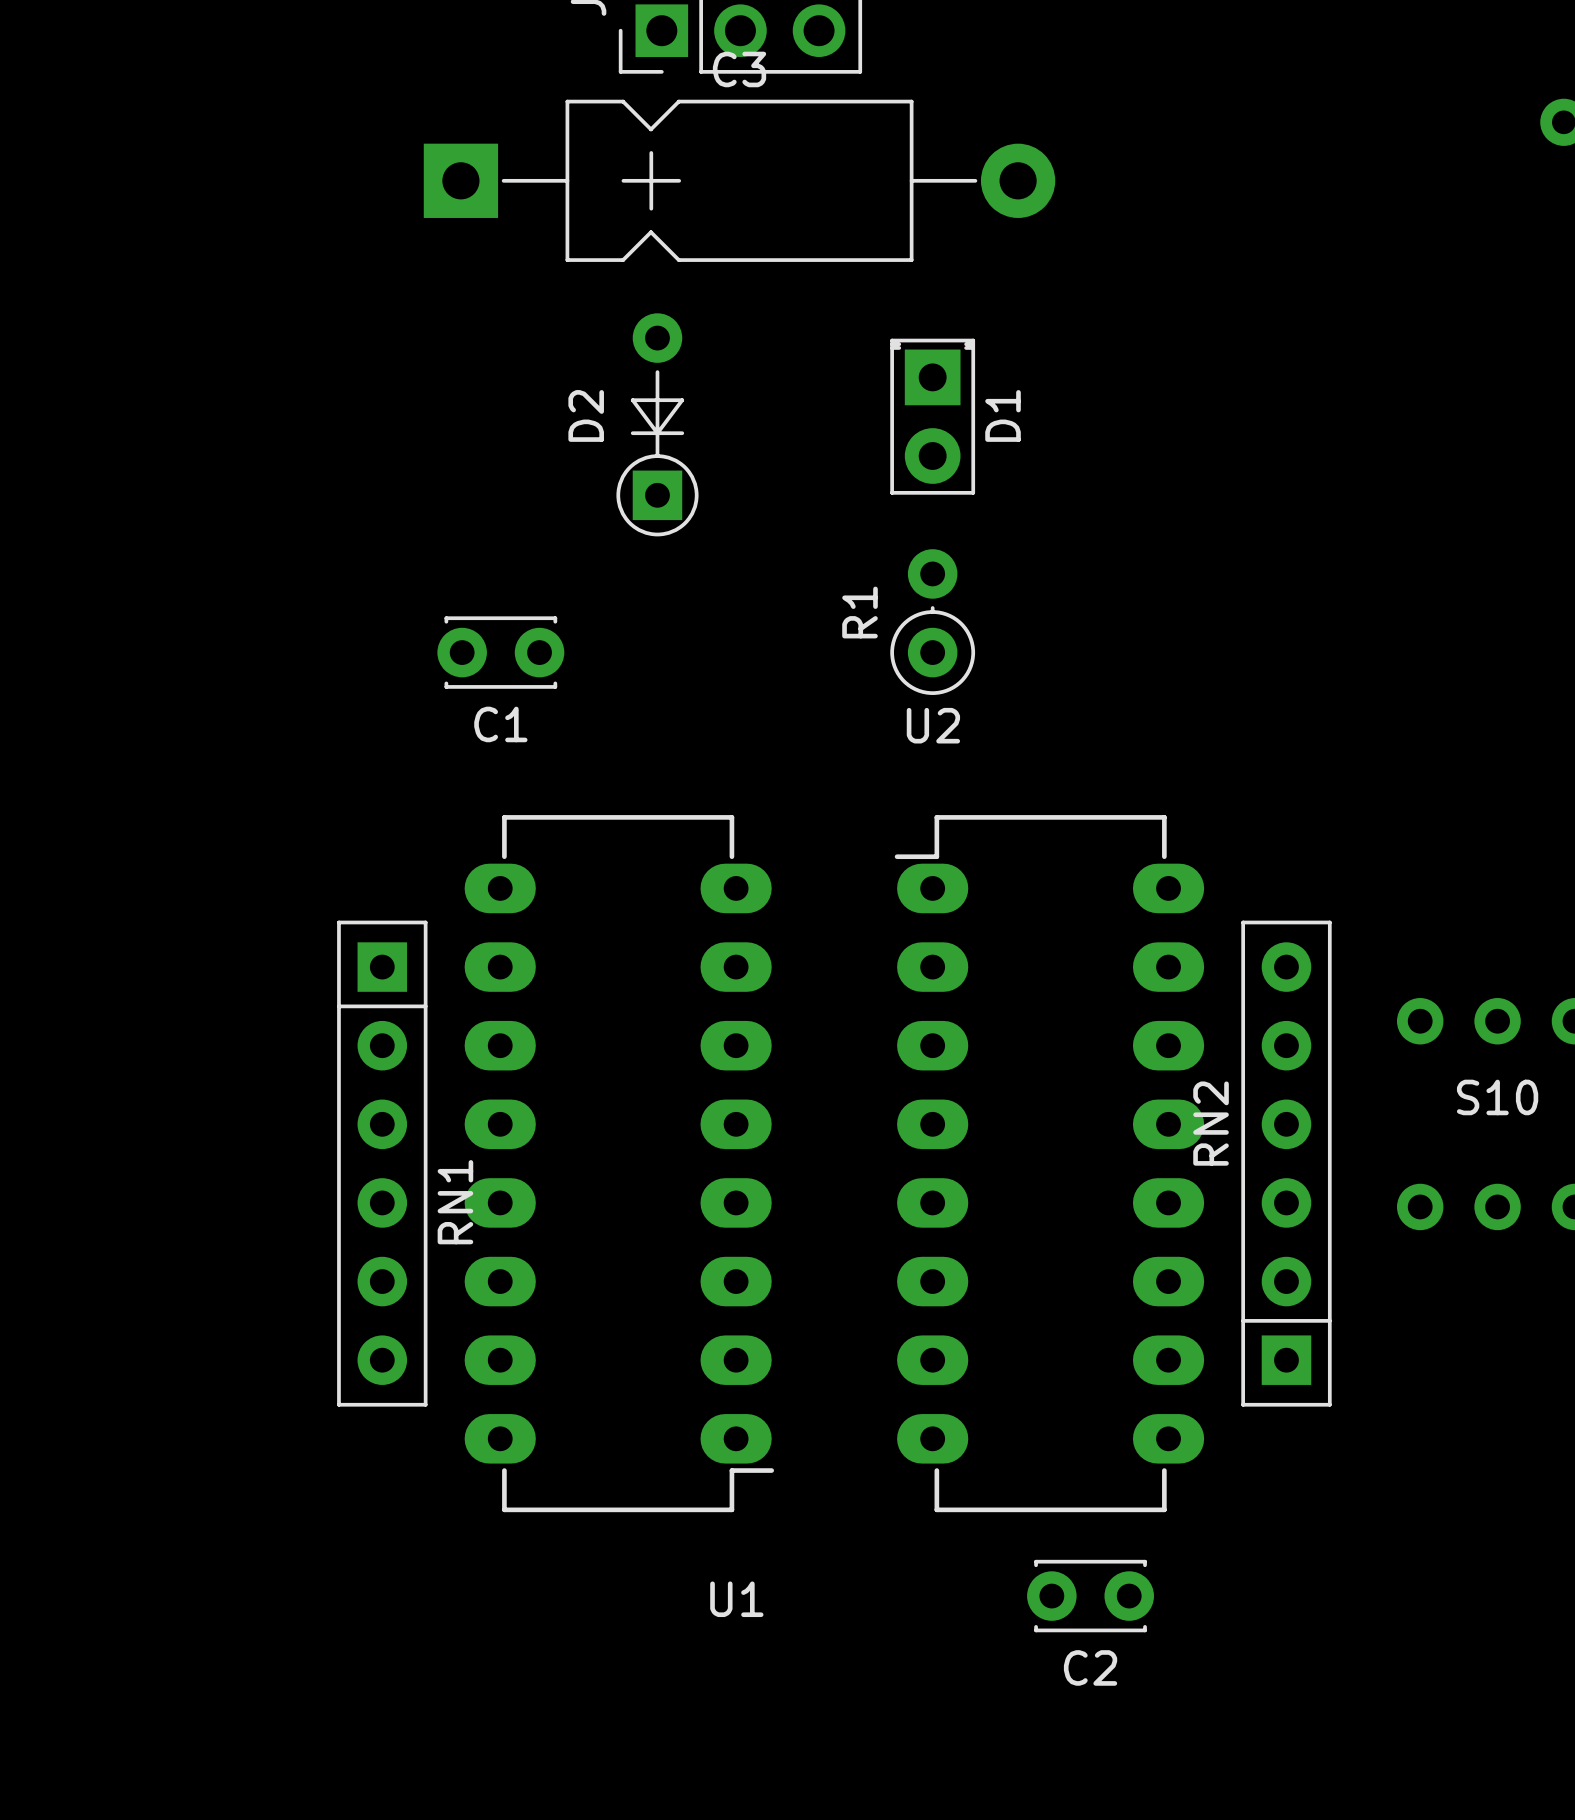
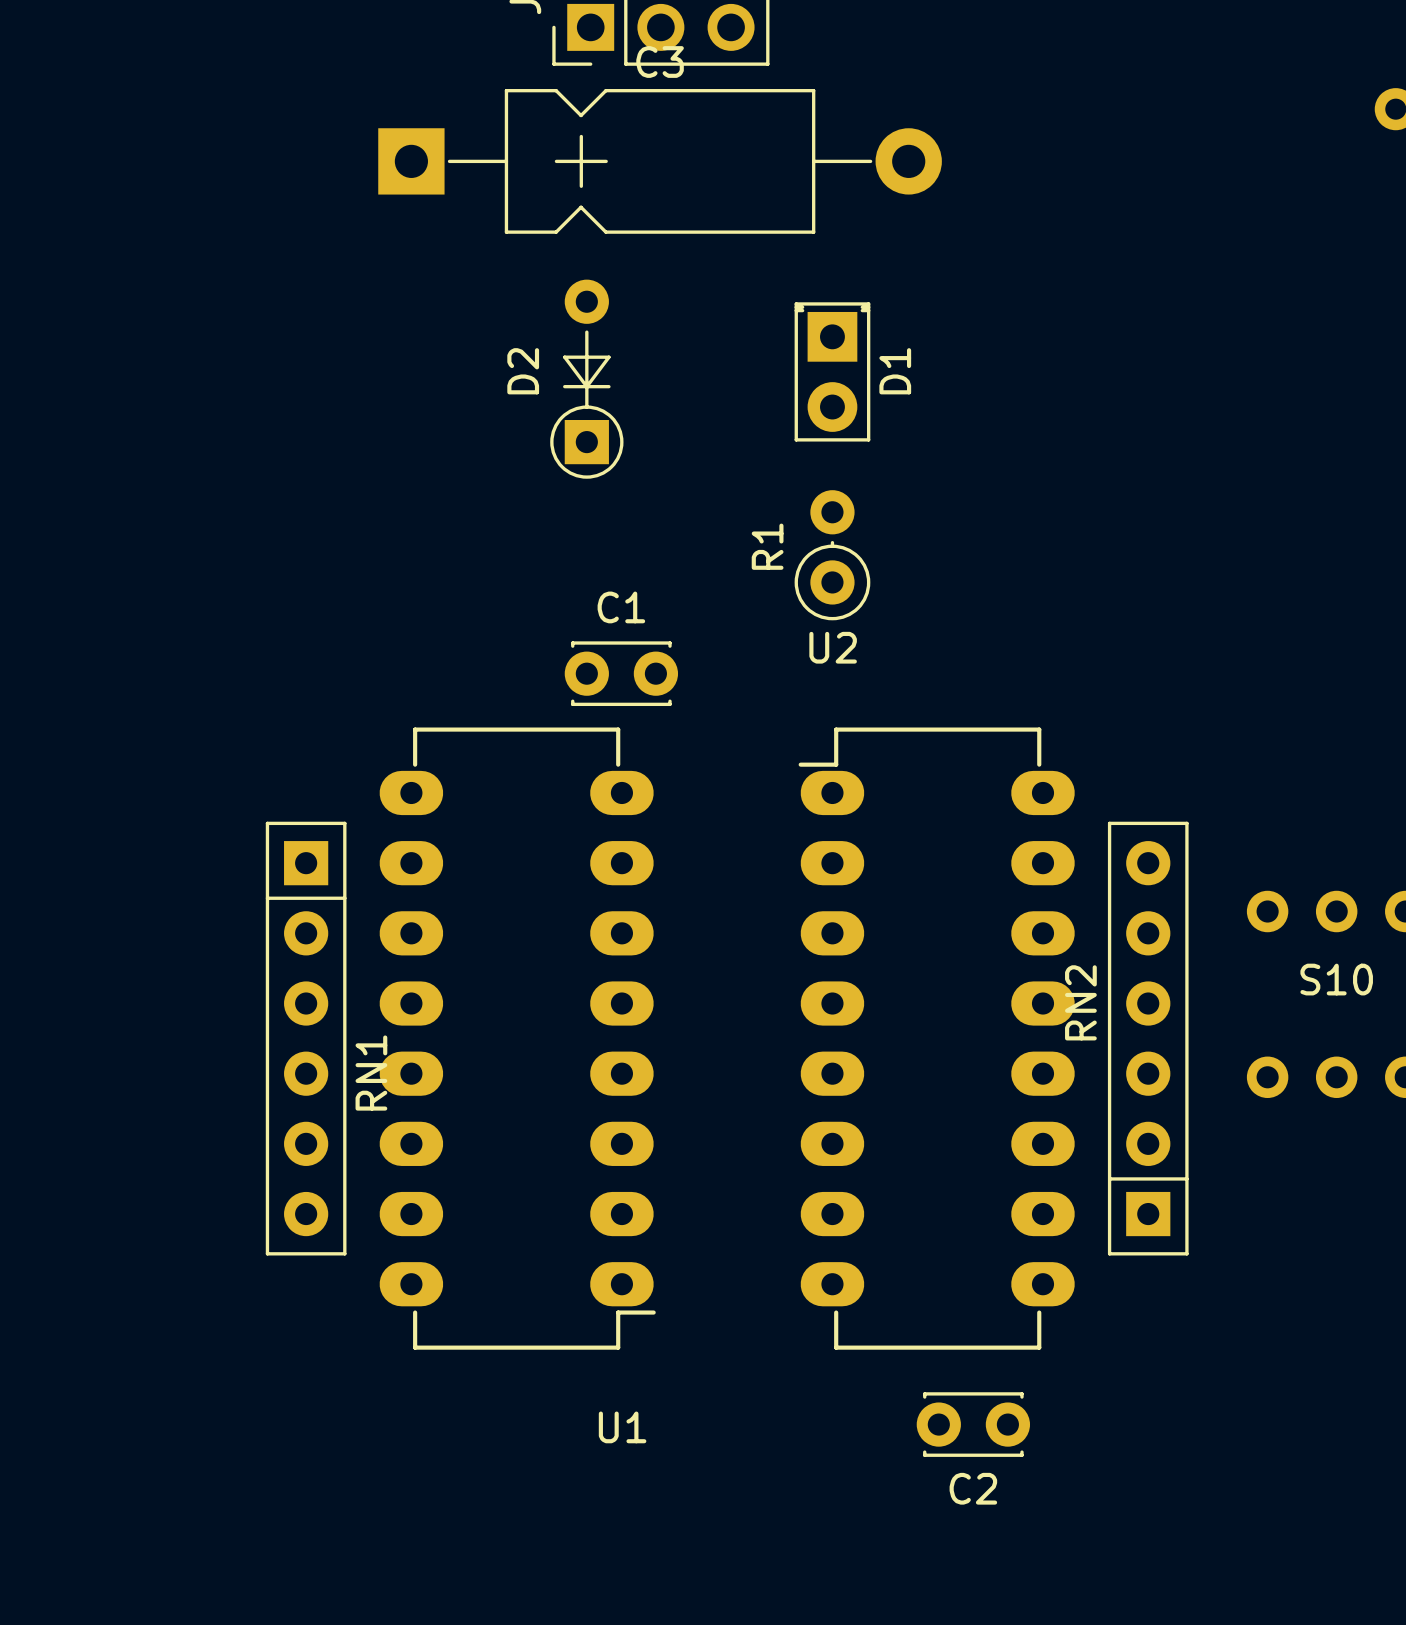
C1 position: (500, 652) -> (621, 673)
C1 name position: C1 (500, 724) -> C1 (621, 607)
RN1 position: (382, 1163) -> (306, 1038)
U1 position: (619, 1163) -> (517, 1038)

